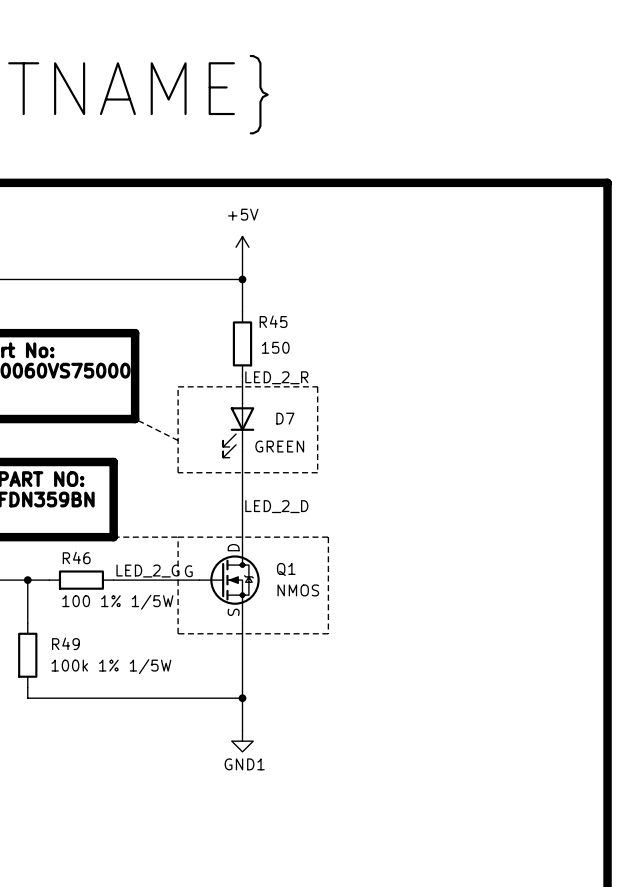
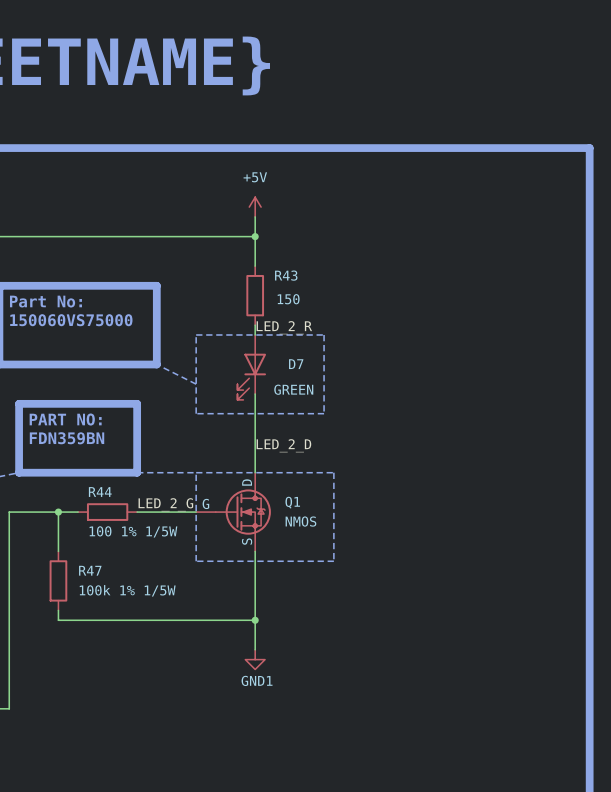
R45 name: R45 (273, 321) -> R43 (286, 275)
R46 name: R46 (76, 557) -> R44 (100, 492)
R49 name: R49 (65, 643) -> R47 (90, 570)

